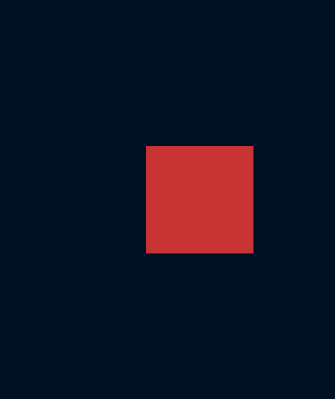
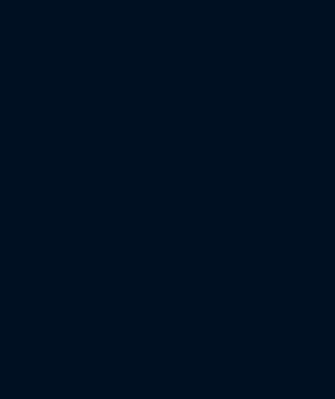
part: (199, 199) -> none

